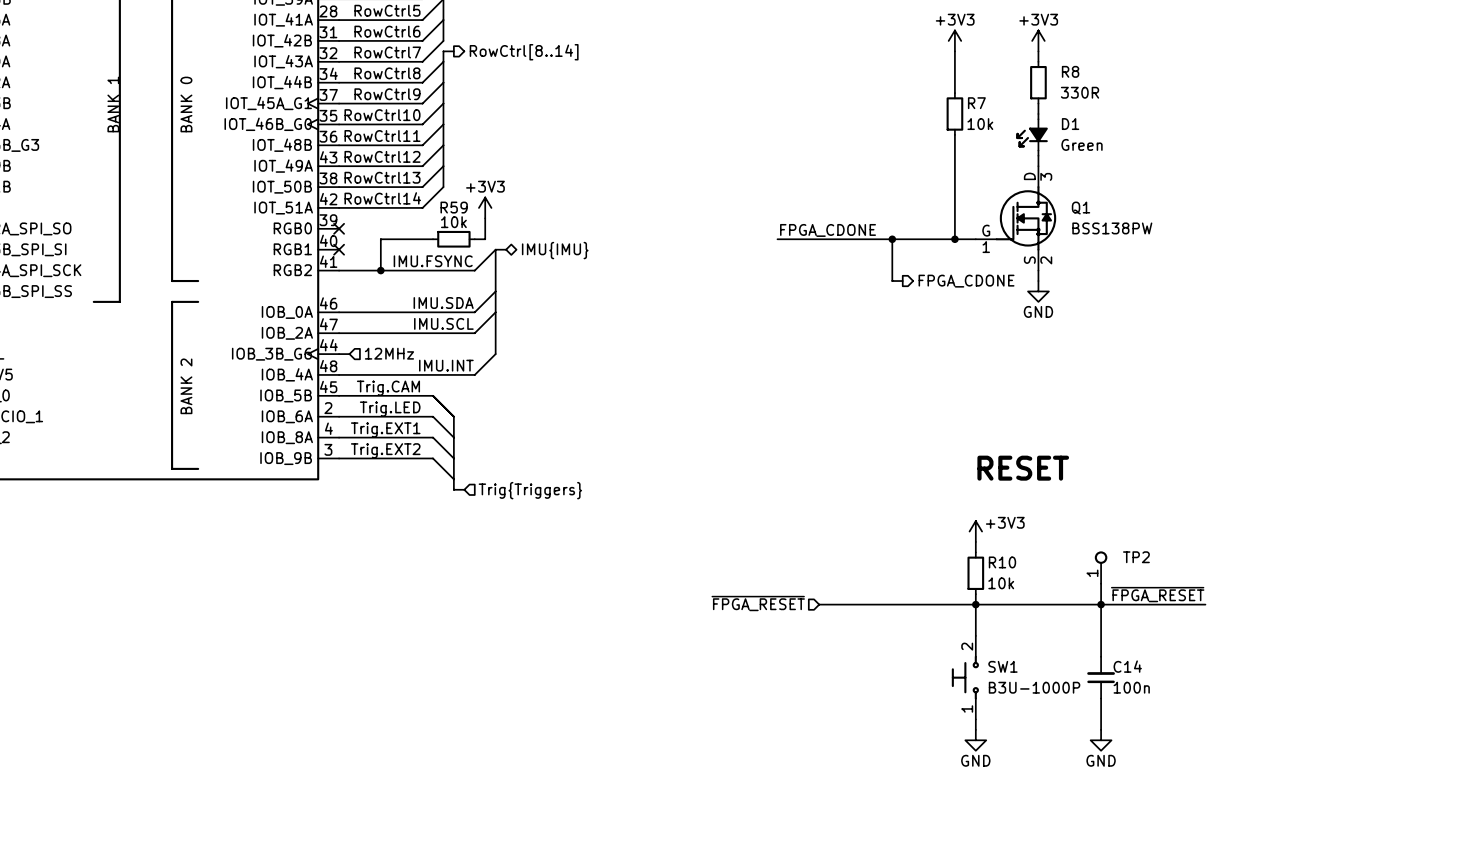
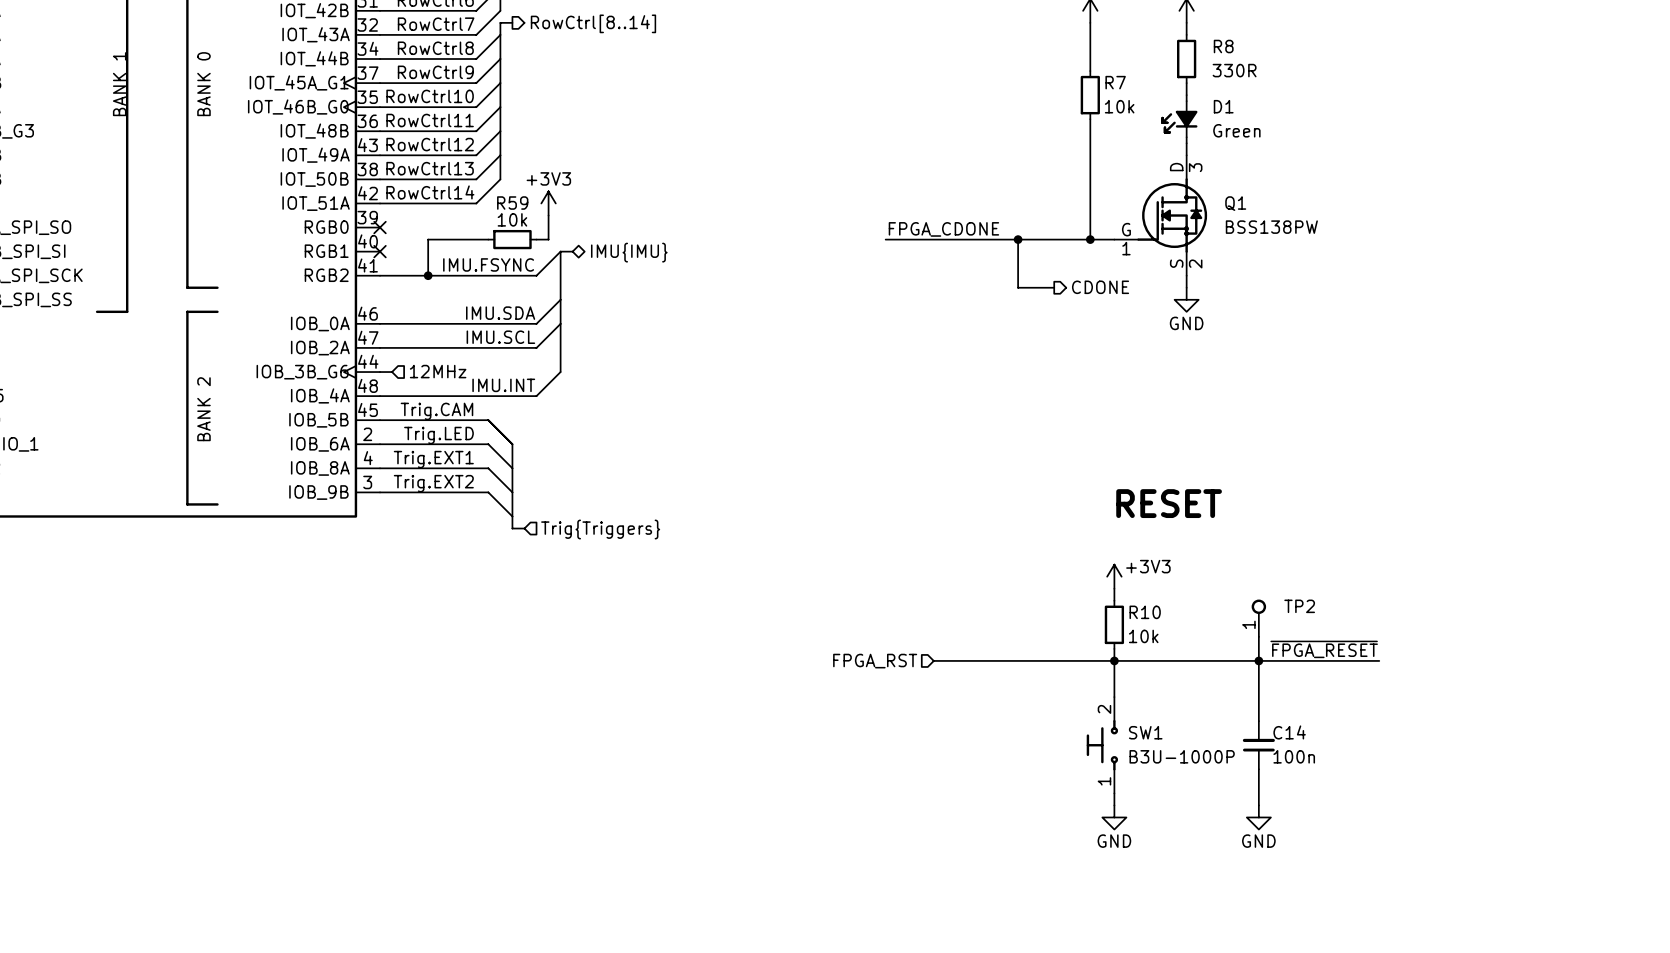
wire: none -> (1030, 287) (1054, 287)
hierarchical label: FPGA_CDONE (966, 281) -> CDONE (1100, 287)
hierarchical label: ~{FPGA_RESET} (758, 603) -> FPGA_RST (875, 661)

